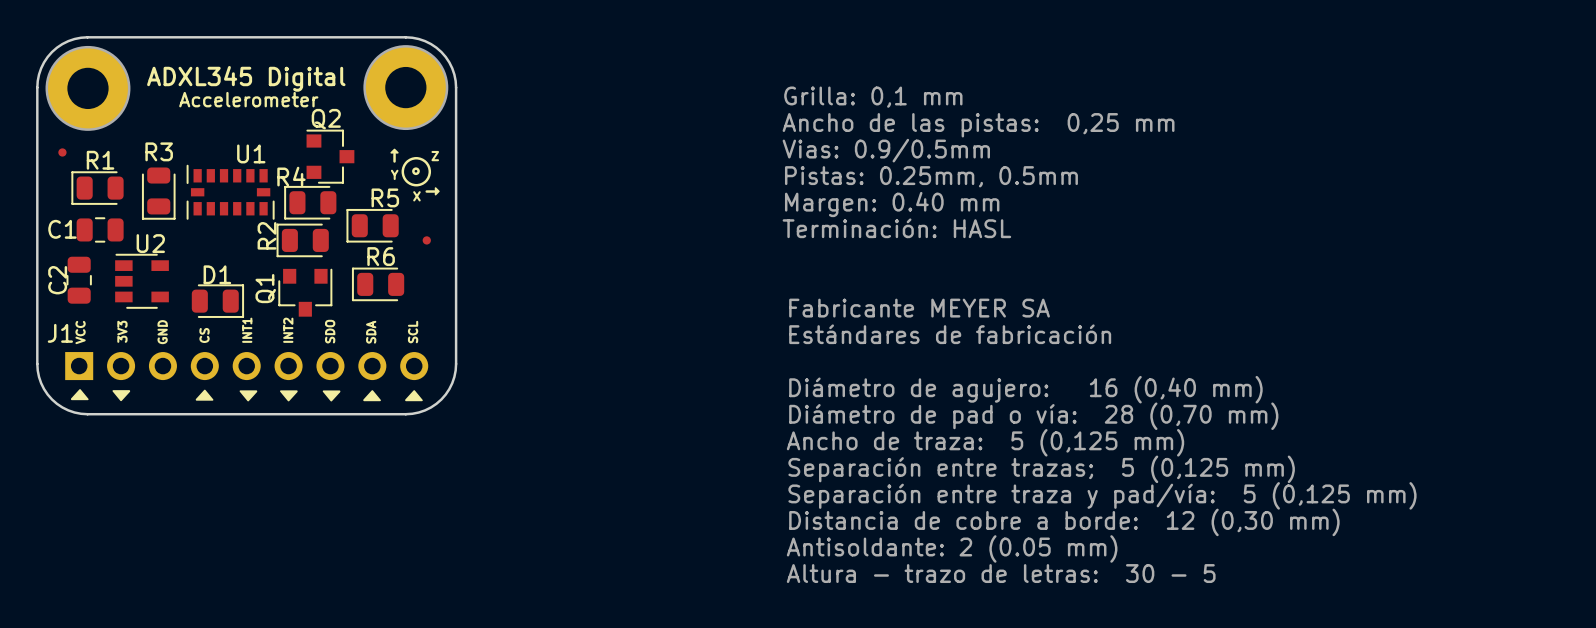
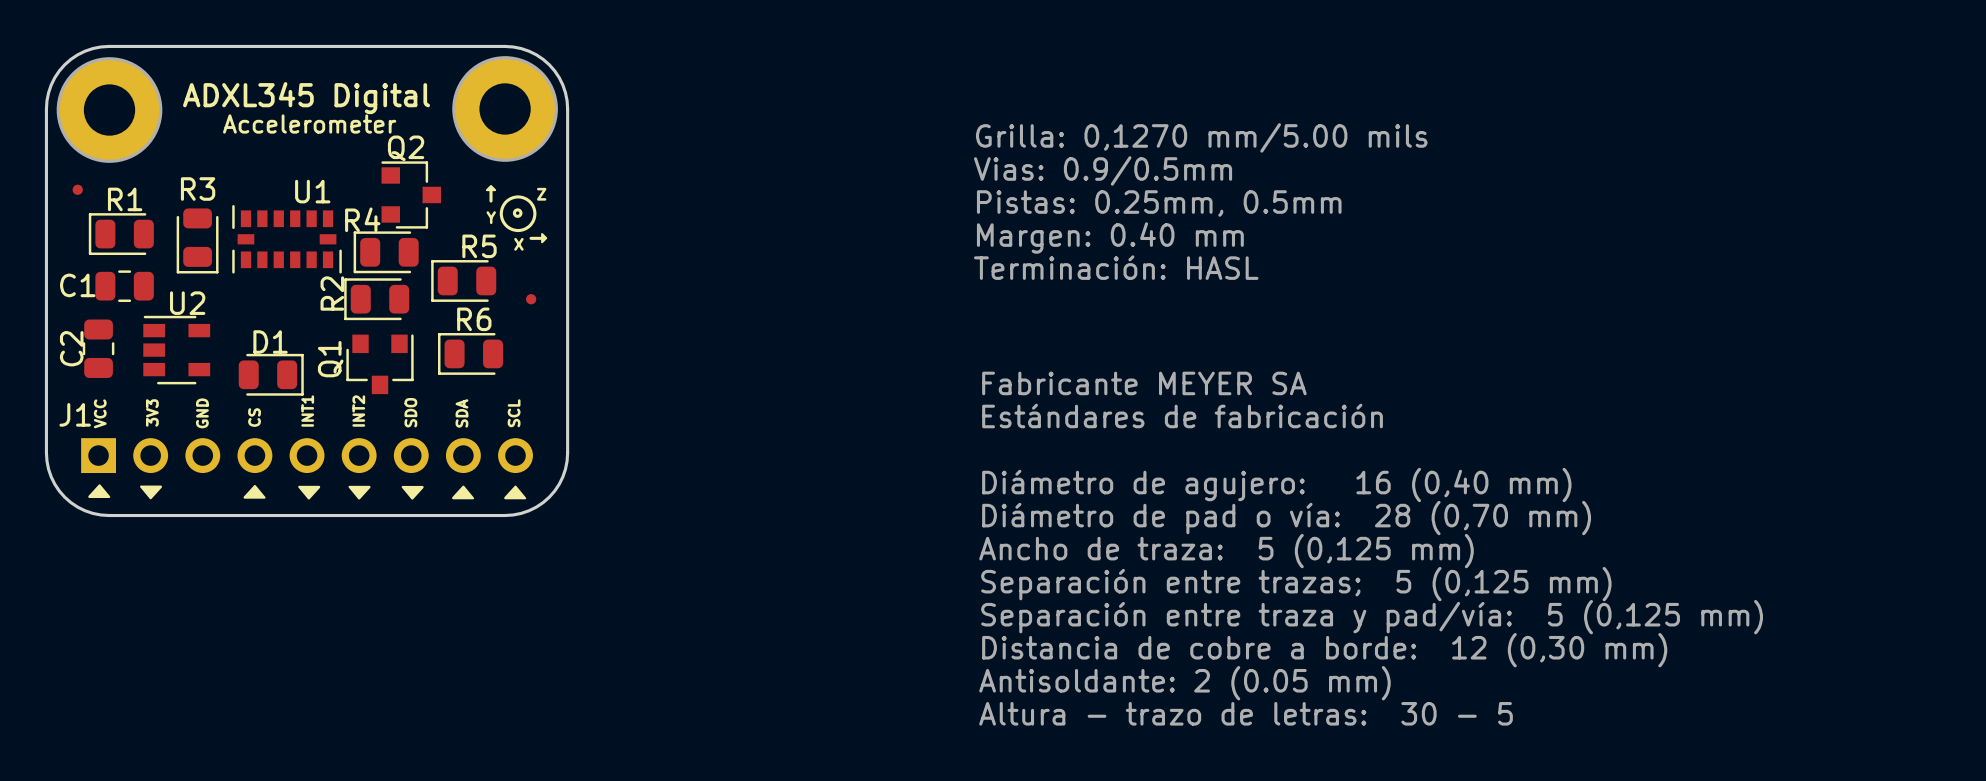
text: Grilla: 0,1 mm (873, 97) -> Grilla: 0,1270 mm/5.00 mils (1201, 137)
text: Ancho de las pistas: 0,25 mm (978, 125) -> none
text position: Vias: 0.9/0.5mm (886, 150) -> Vias: 0.9/0.5mm (1103, 170)
text position: Pistas: 0.25mm, 0.5mm (931, 176) -> Pistas: 0.25mm, 0.5mm (1159, 203)
text position: Margen: 0.40 mm (892, 204) -> Margen: 0.40 mm (1110, 238)
text position: Terminación: HASL (896, 228) -> Terminación: HASL (1116, 267)

